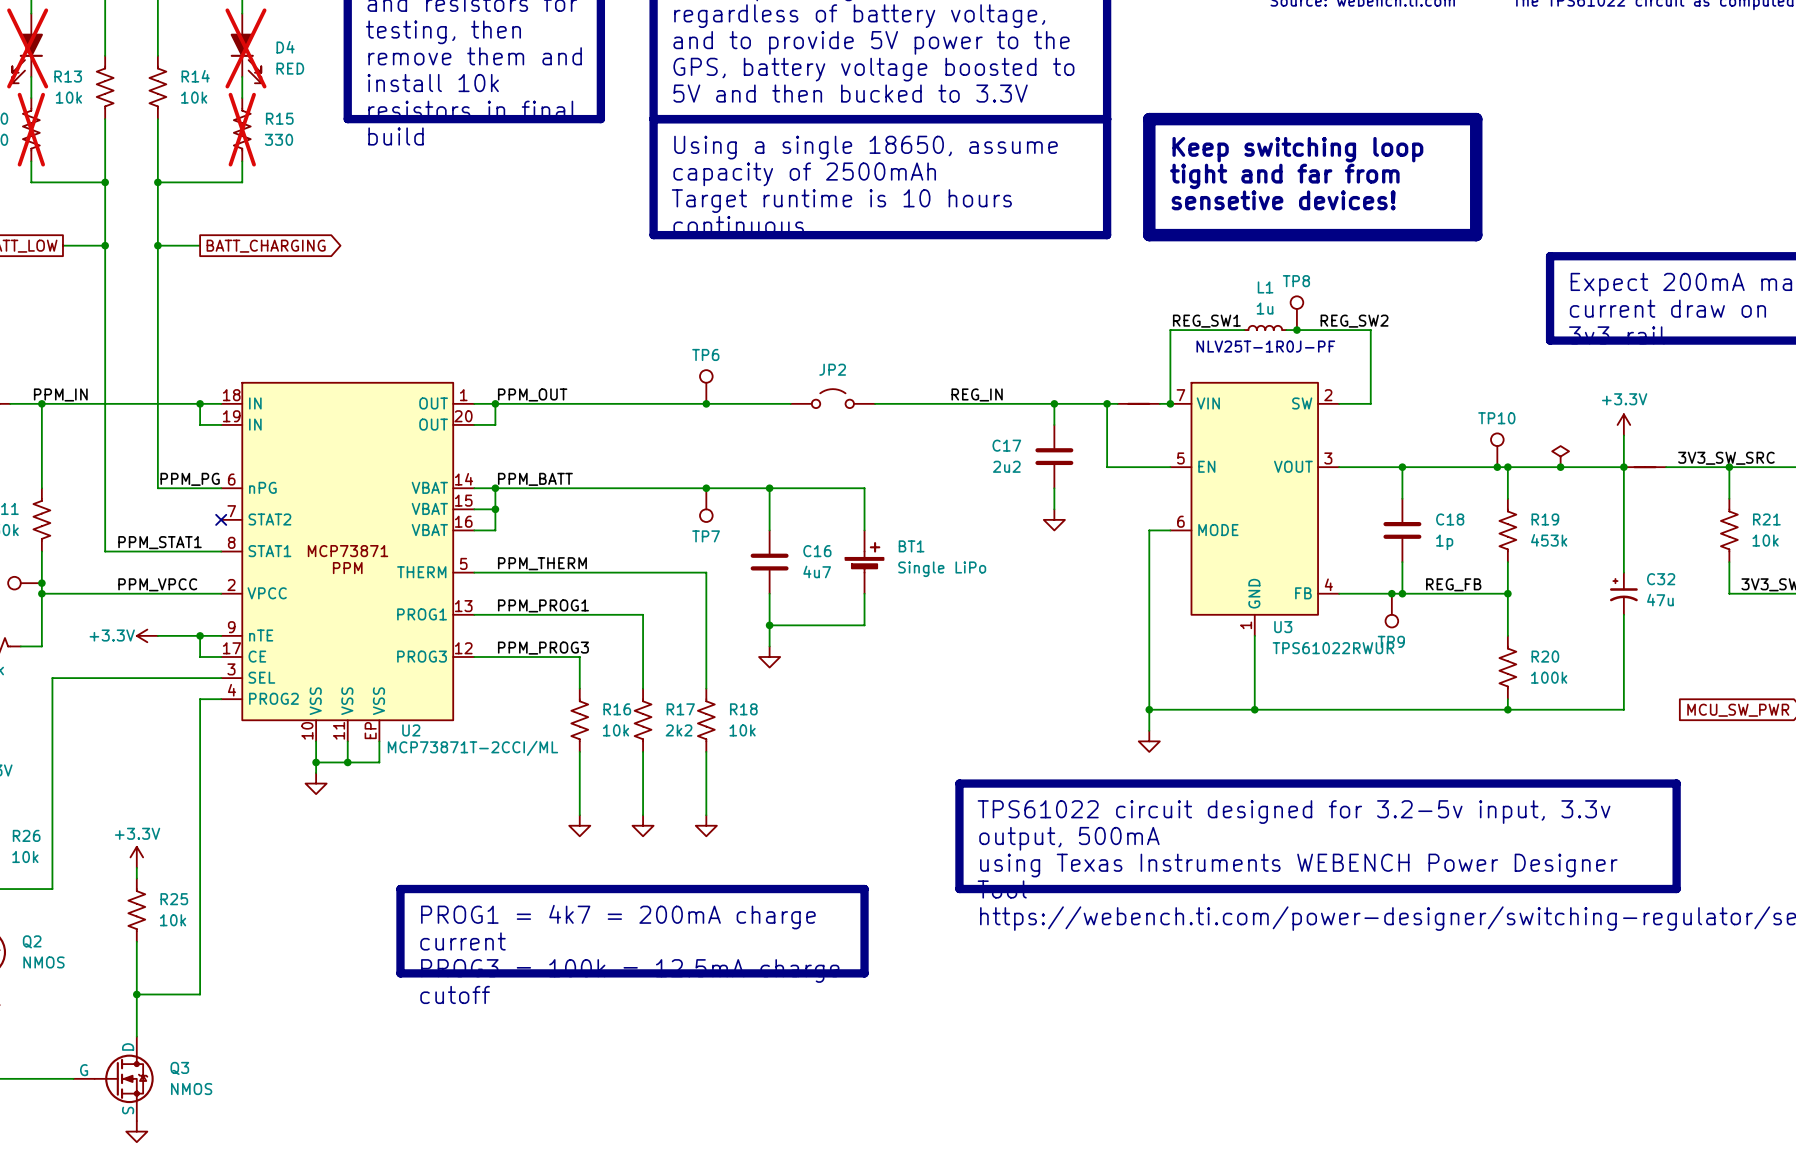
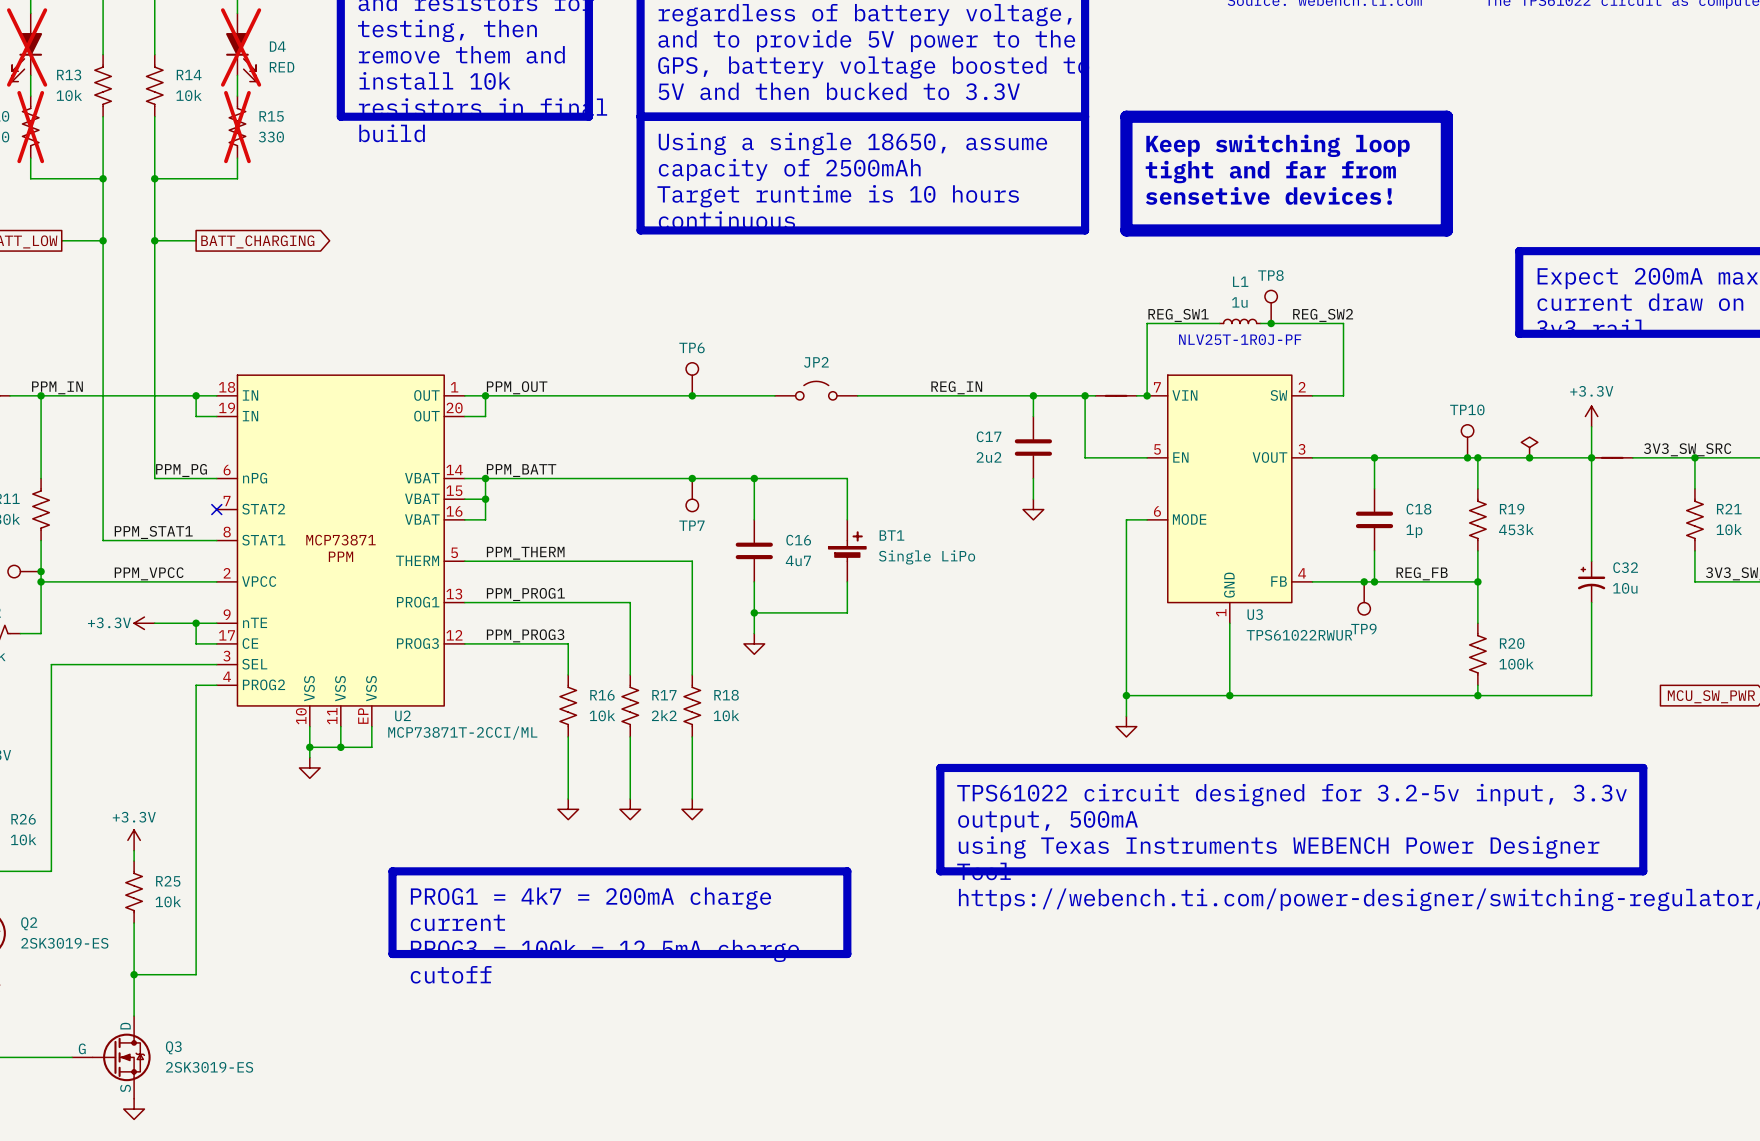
C32 value: 47u (1660, 600) -> 10u (1625, 588)
Q2 value: NMOS (43, 962) -> 2SK3019-ES (64, 943)
Q3 value: NMOS (191, 1089) -> 2SK3019-ES (209, 1067)

